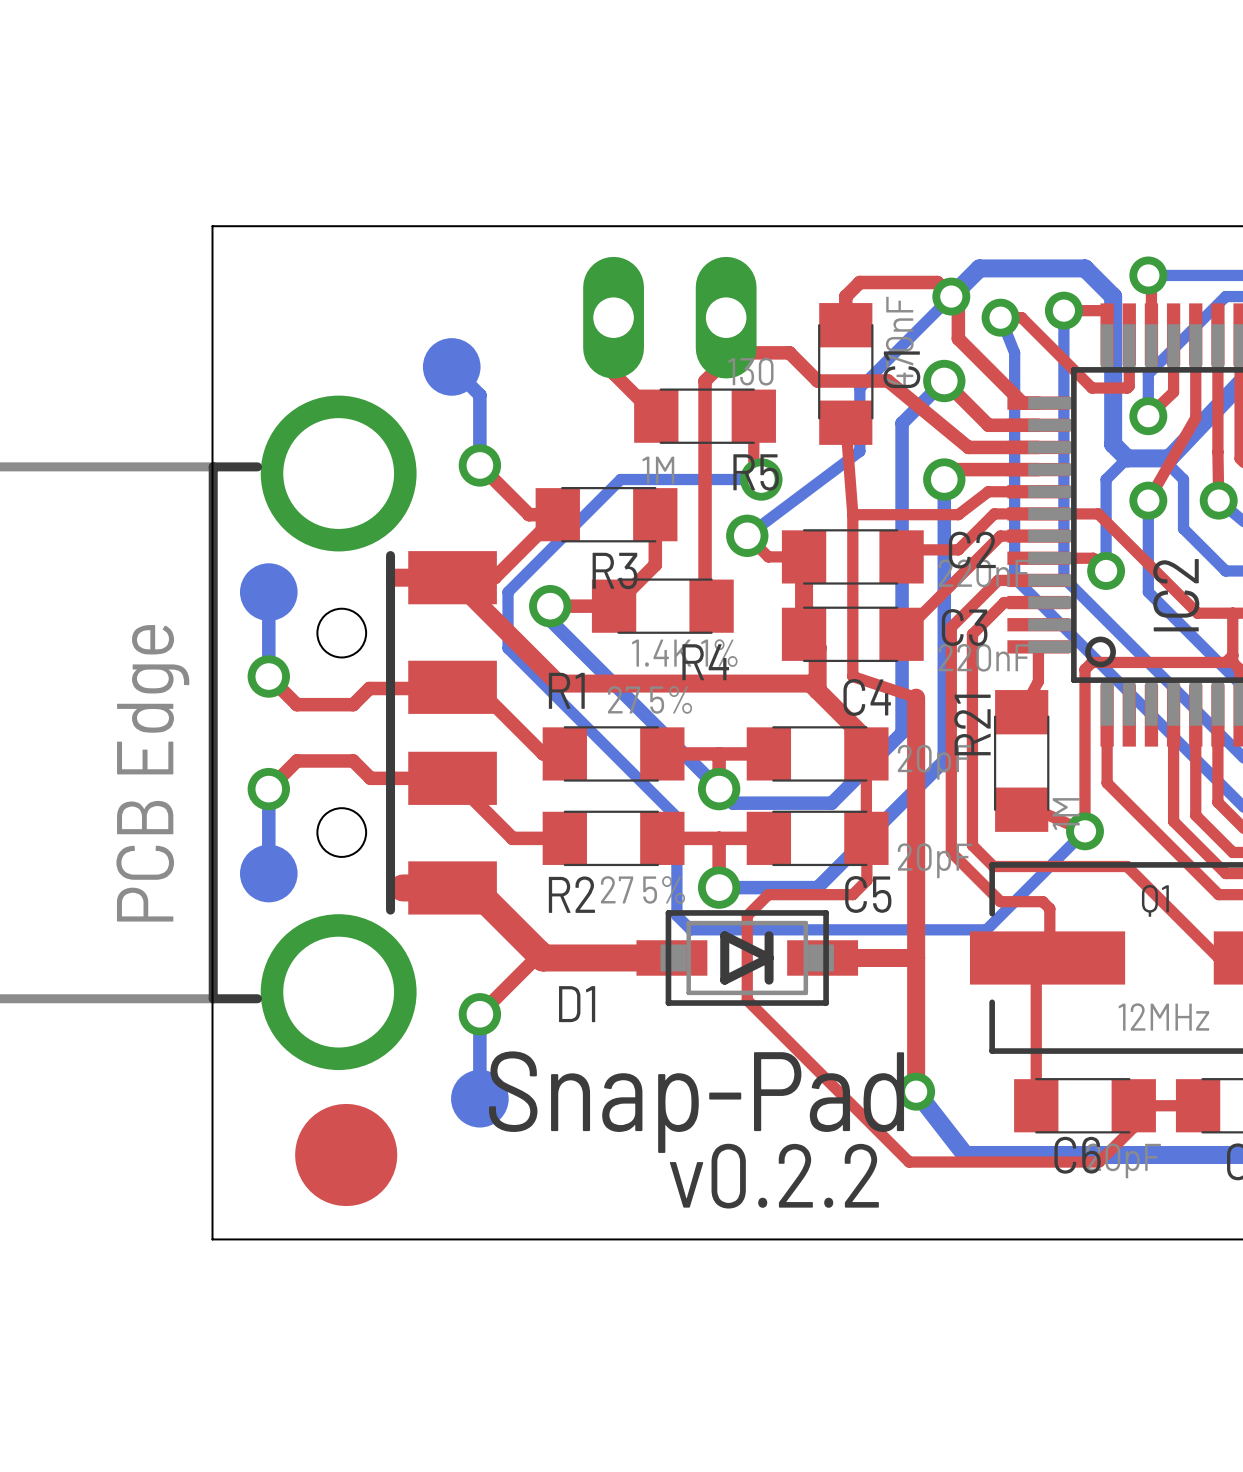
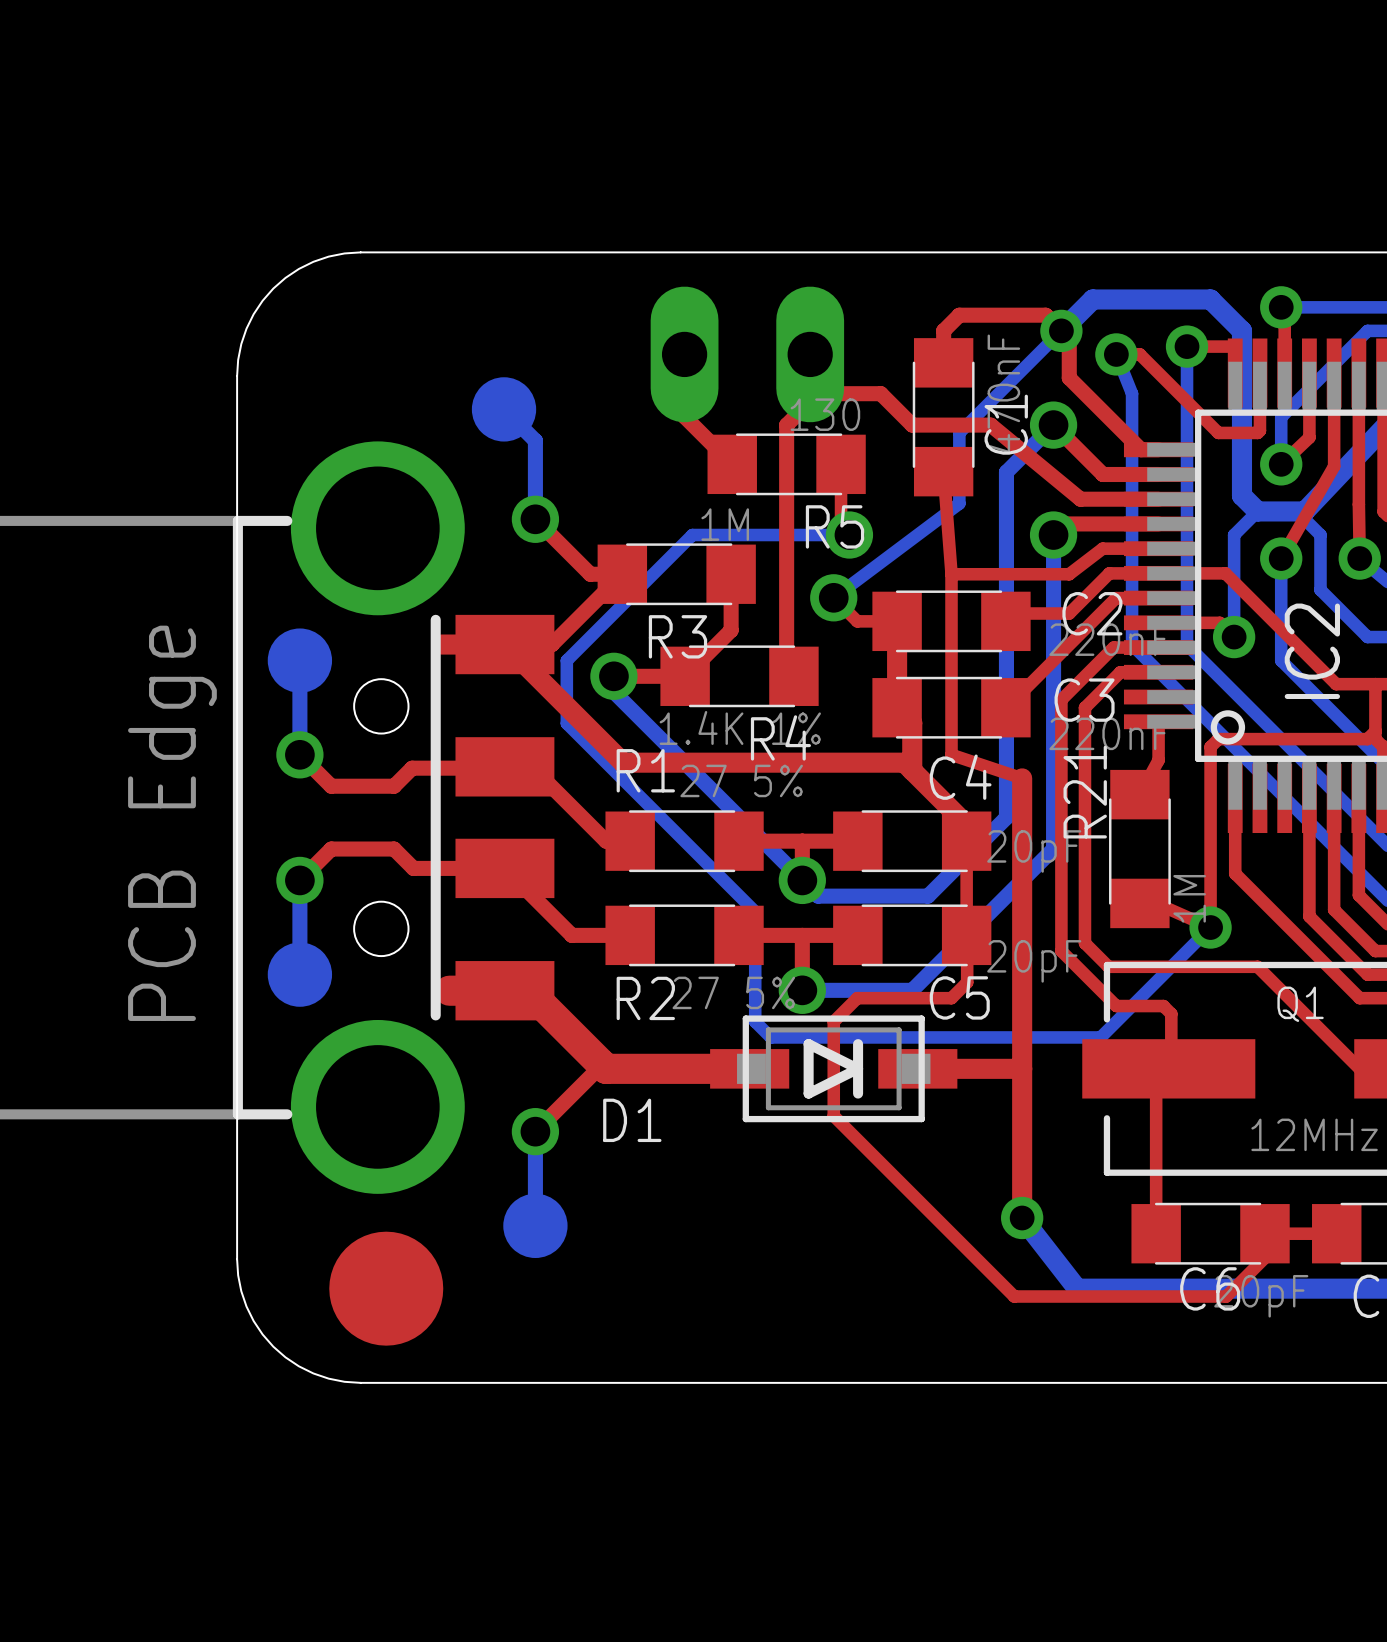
board edge: (323, 226) (212, 226) (212, 337) -> (360, 252) (344, 253) (313, 261) (298, 268) (273, 288) (253, 314) (246, 328) (238, 359) (237, 376)
text: Snap-Pad (696, 1102) -> none
board edge: (212, 1128) (212, 1239) (323, 1239) -> (237, 1259) (238, 1275) (246, 1306) (253, 1321) (273, 1346) (298, 1366) (313, 1373) (344, 1381) (360, 1382)
text: v0.2.2 (774, 1176) -> none

